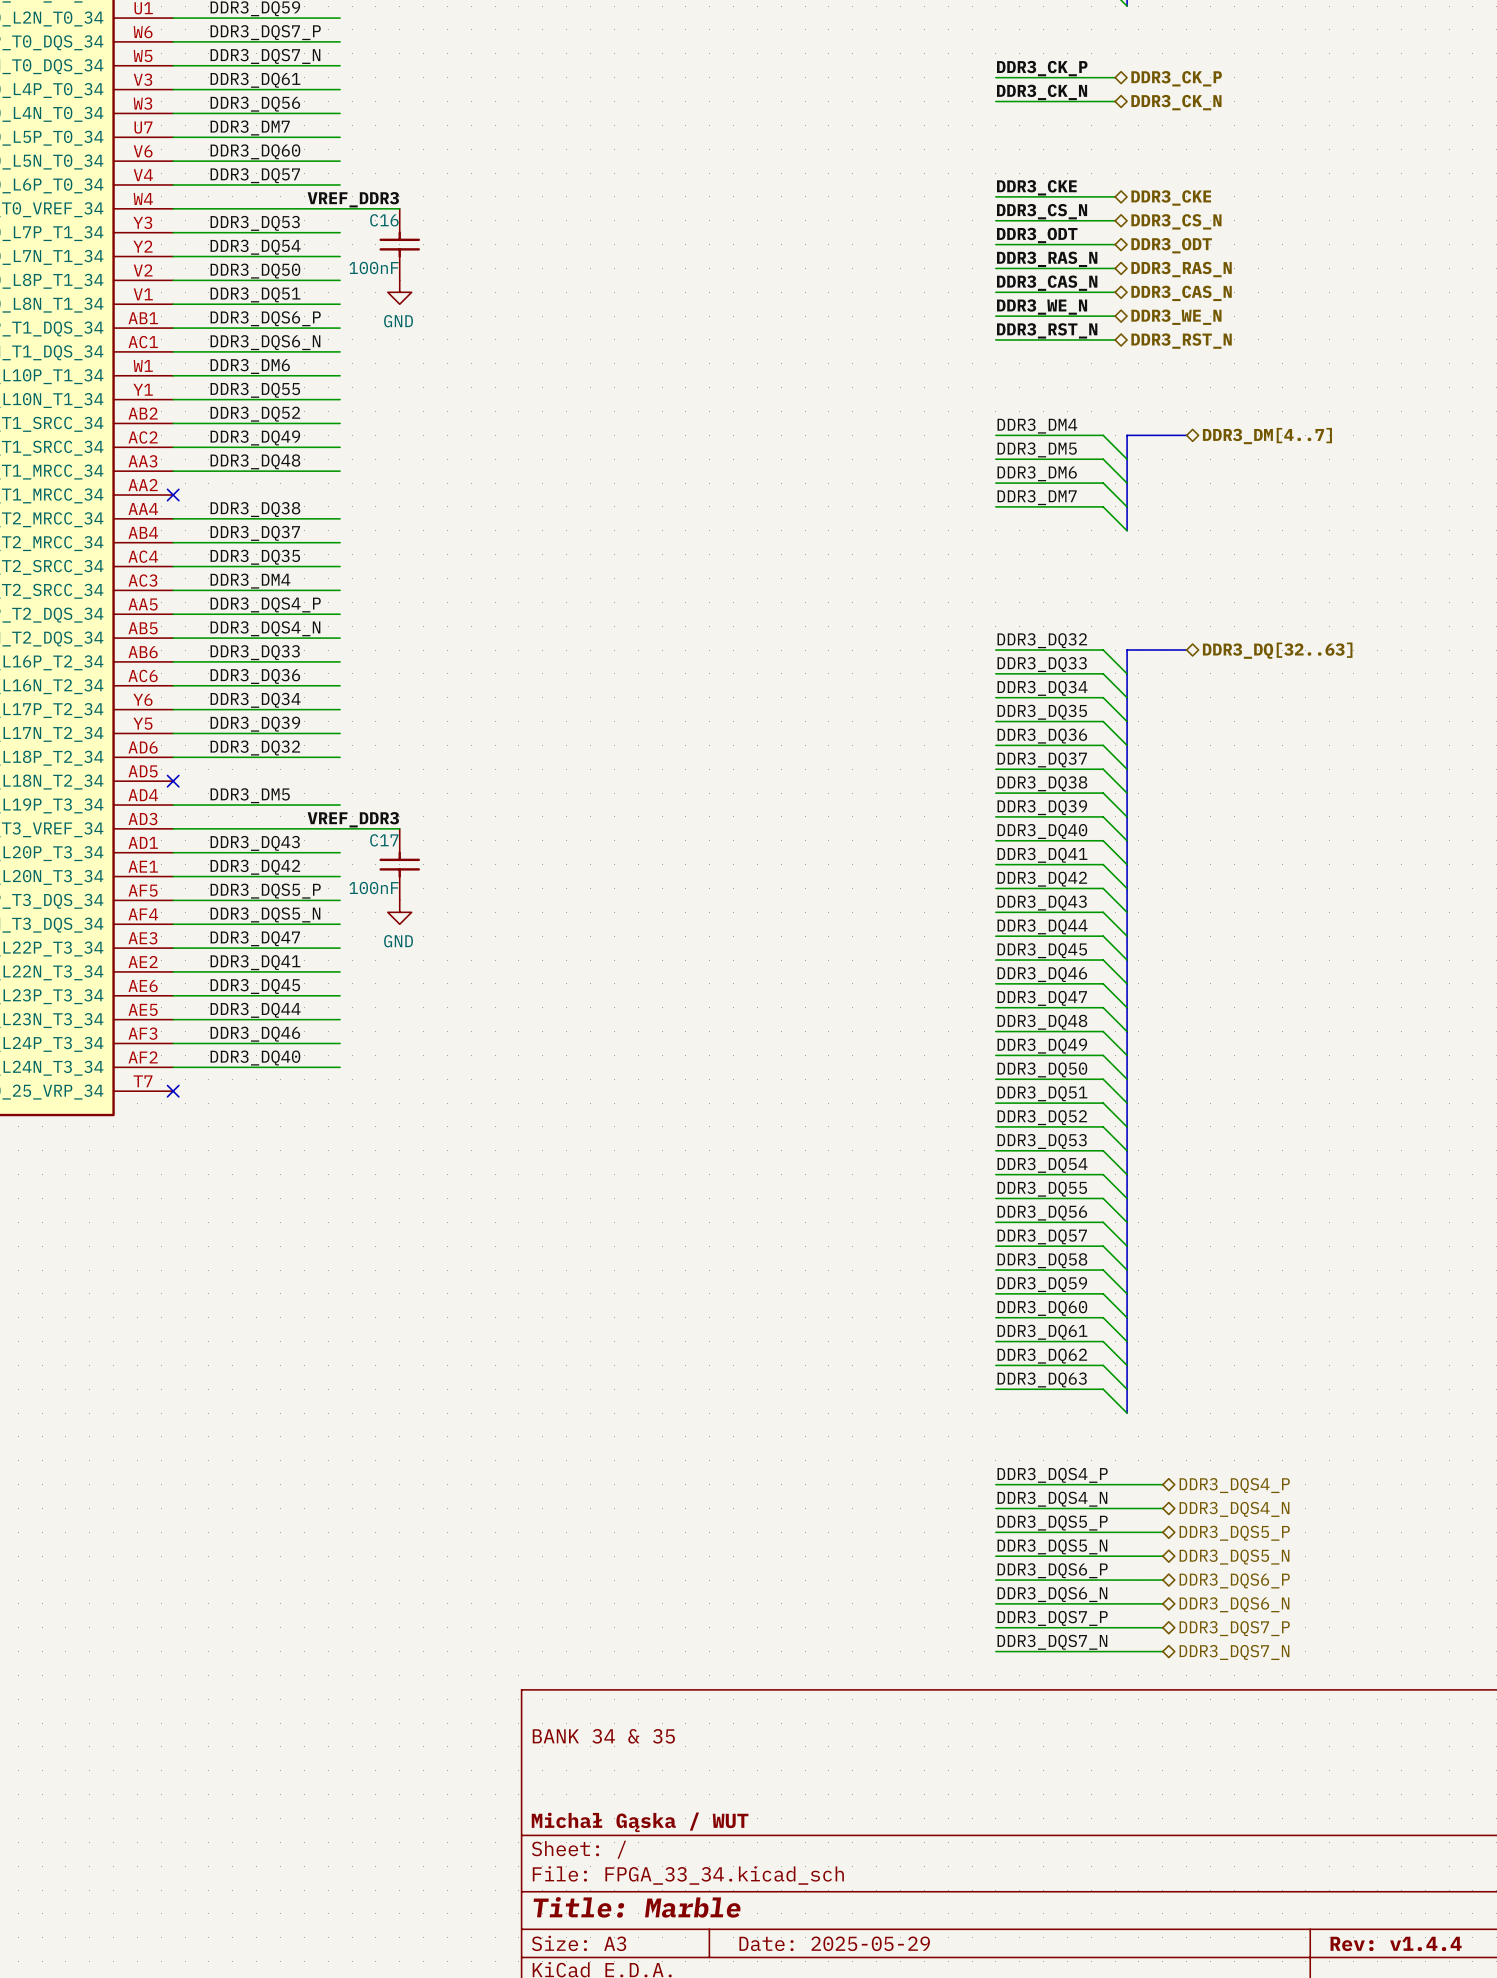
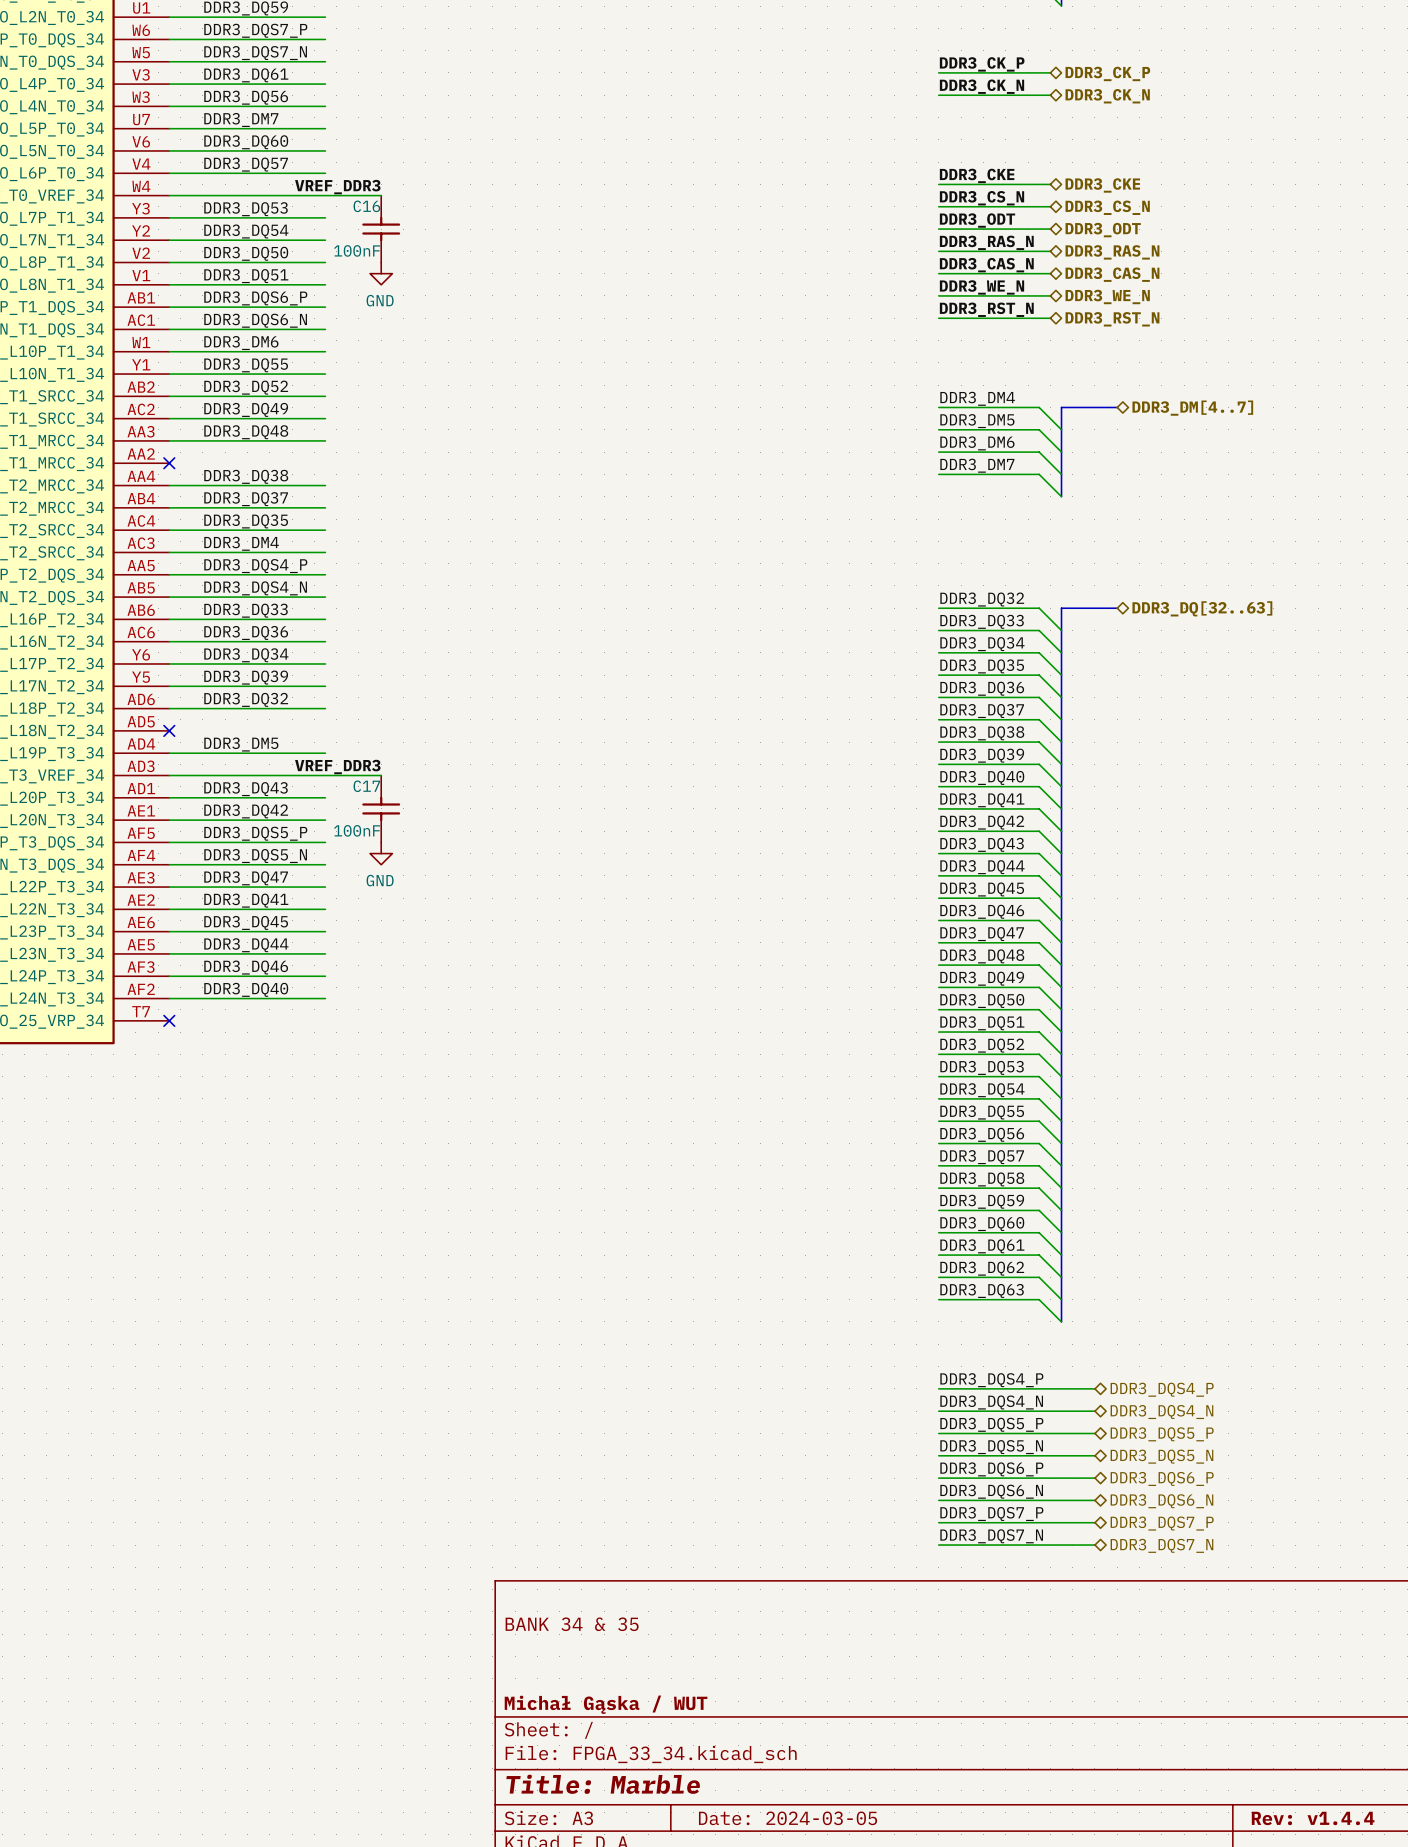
title block: Date: 2025-05-29 (834, 1943) -> Date: 2024-03-05 (788, 1818)

